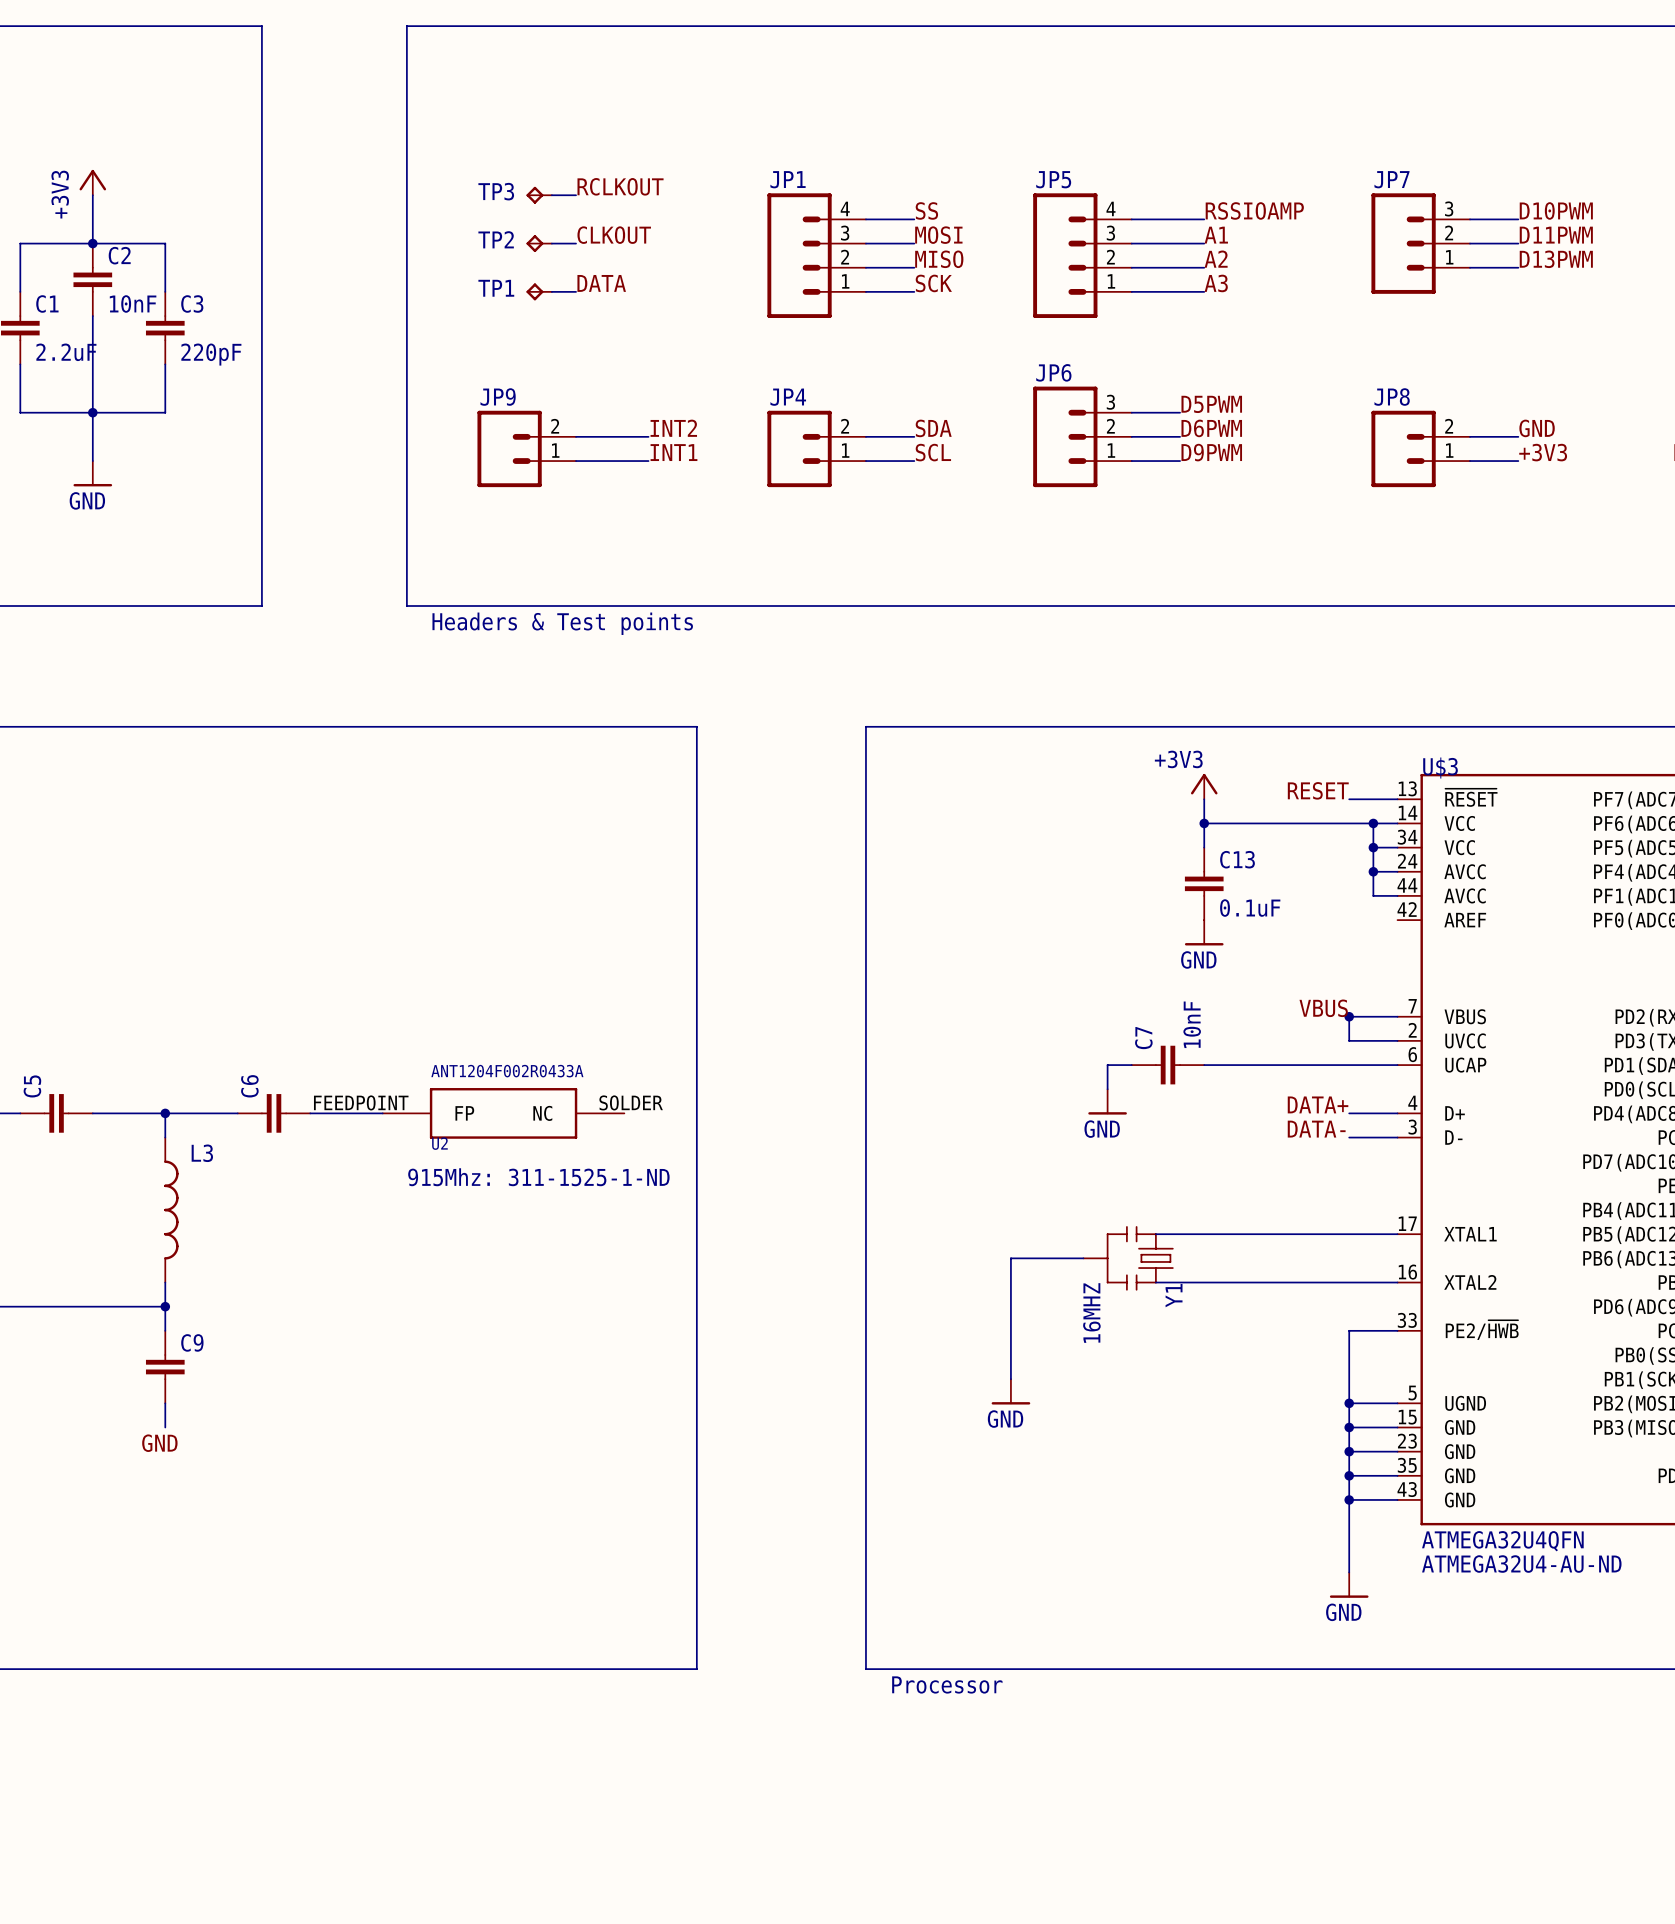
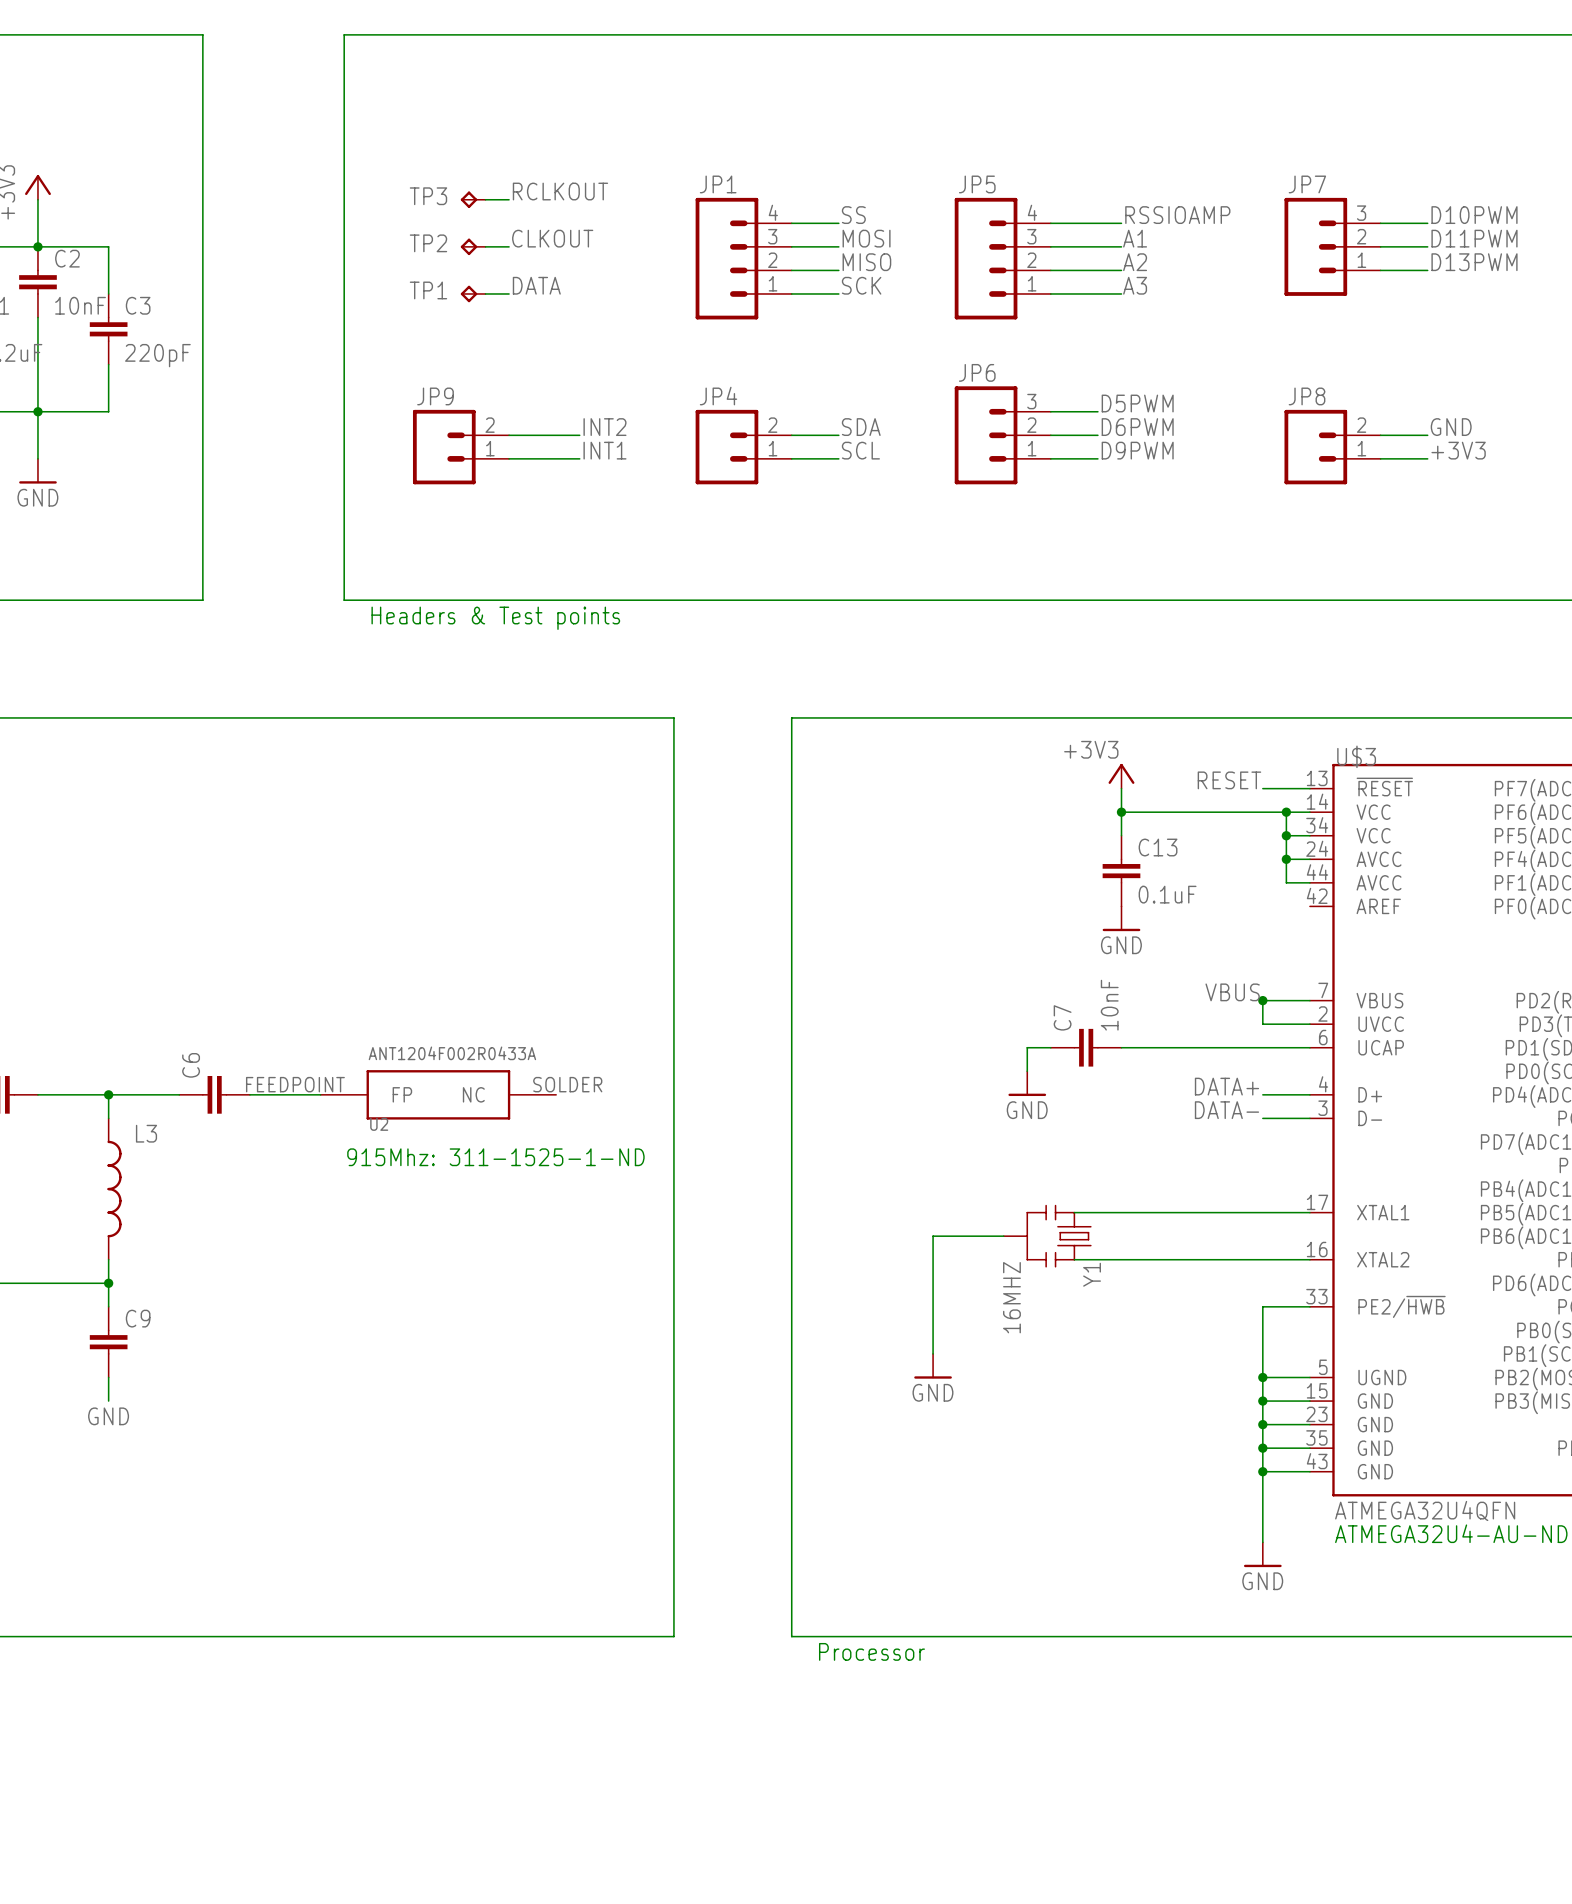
wire: (696, 726) (696, 1669) -> (626, 717) (673, 717) (673, 1636) (626, 1636)

